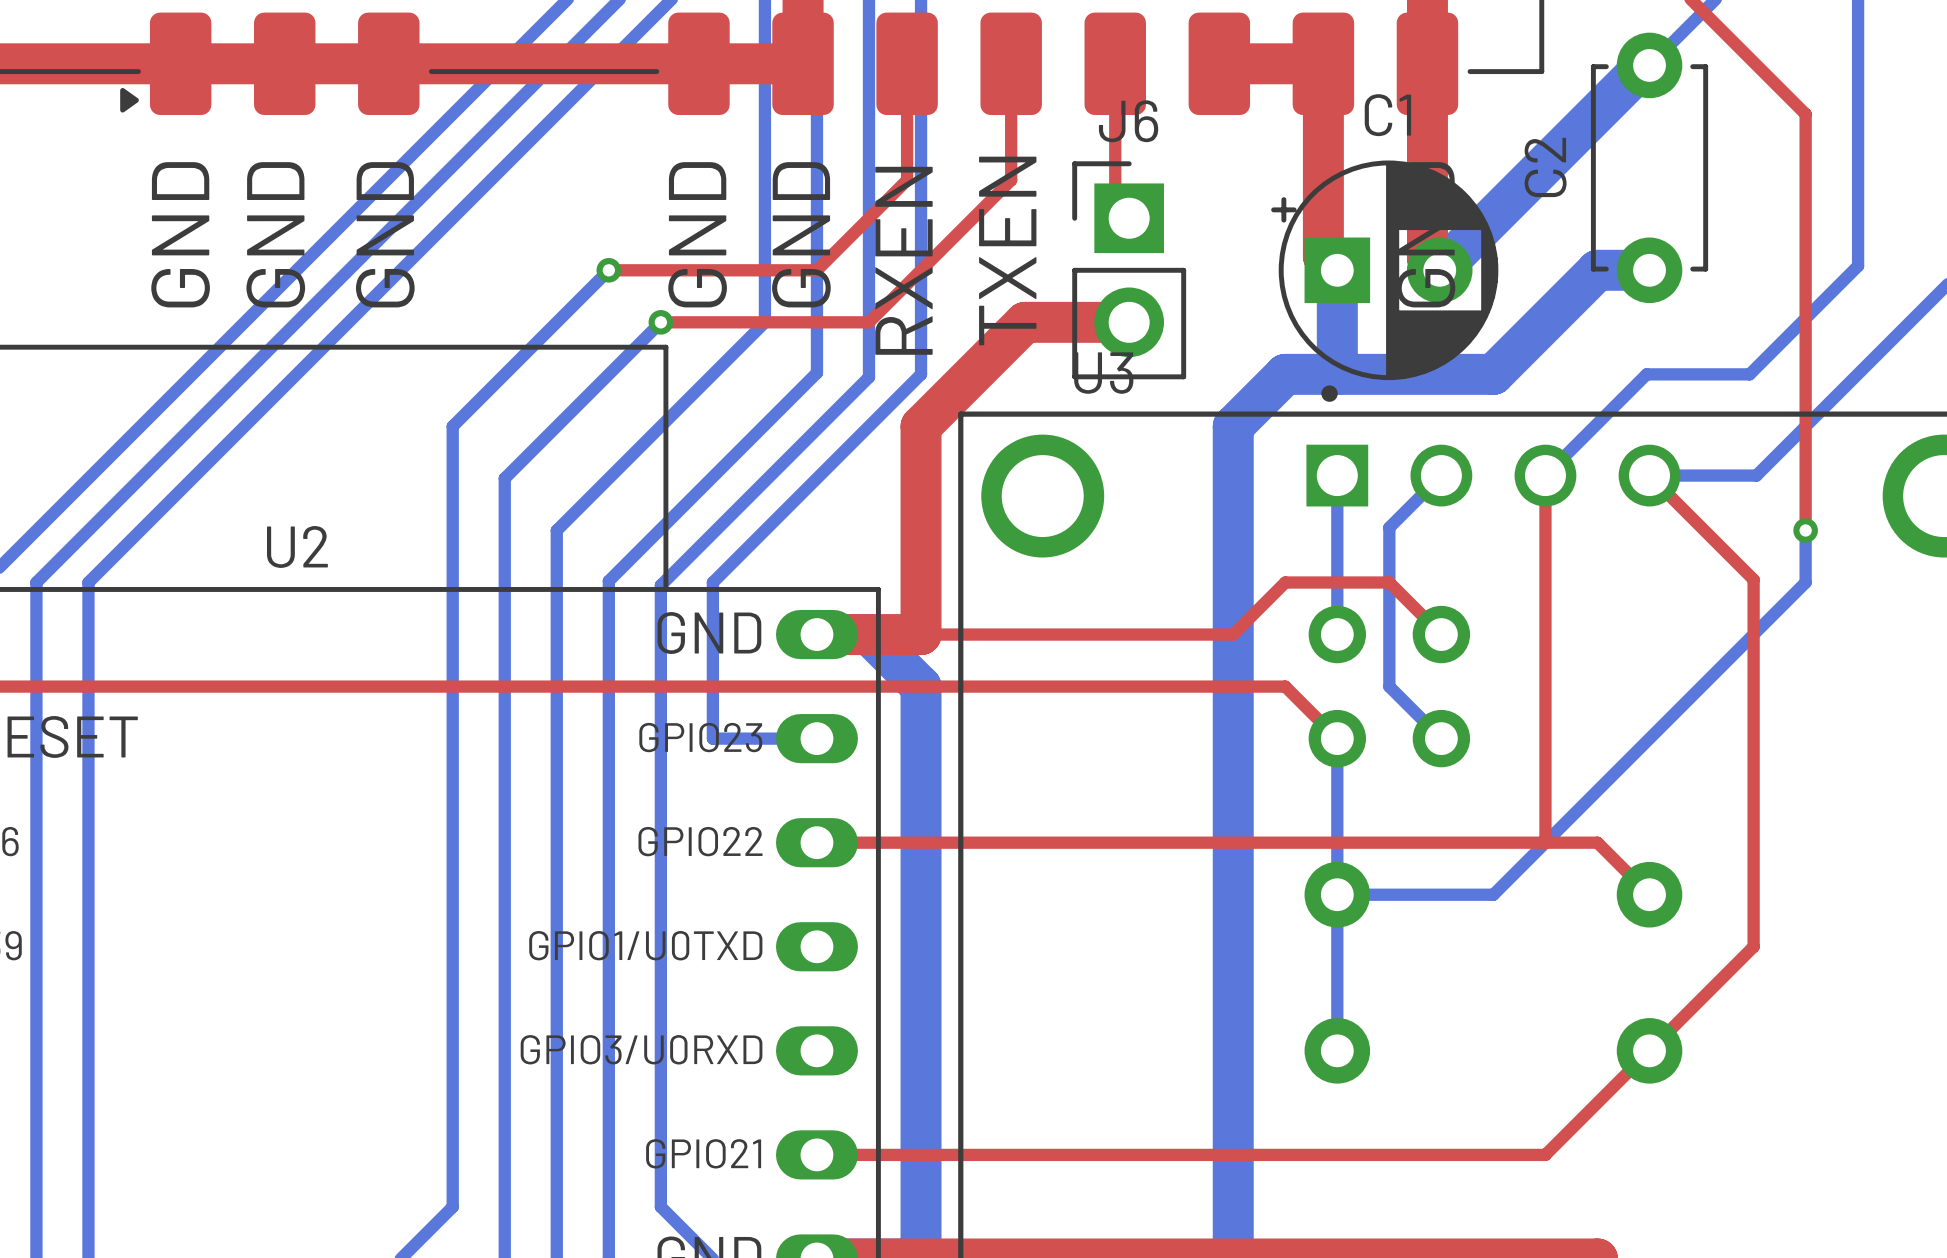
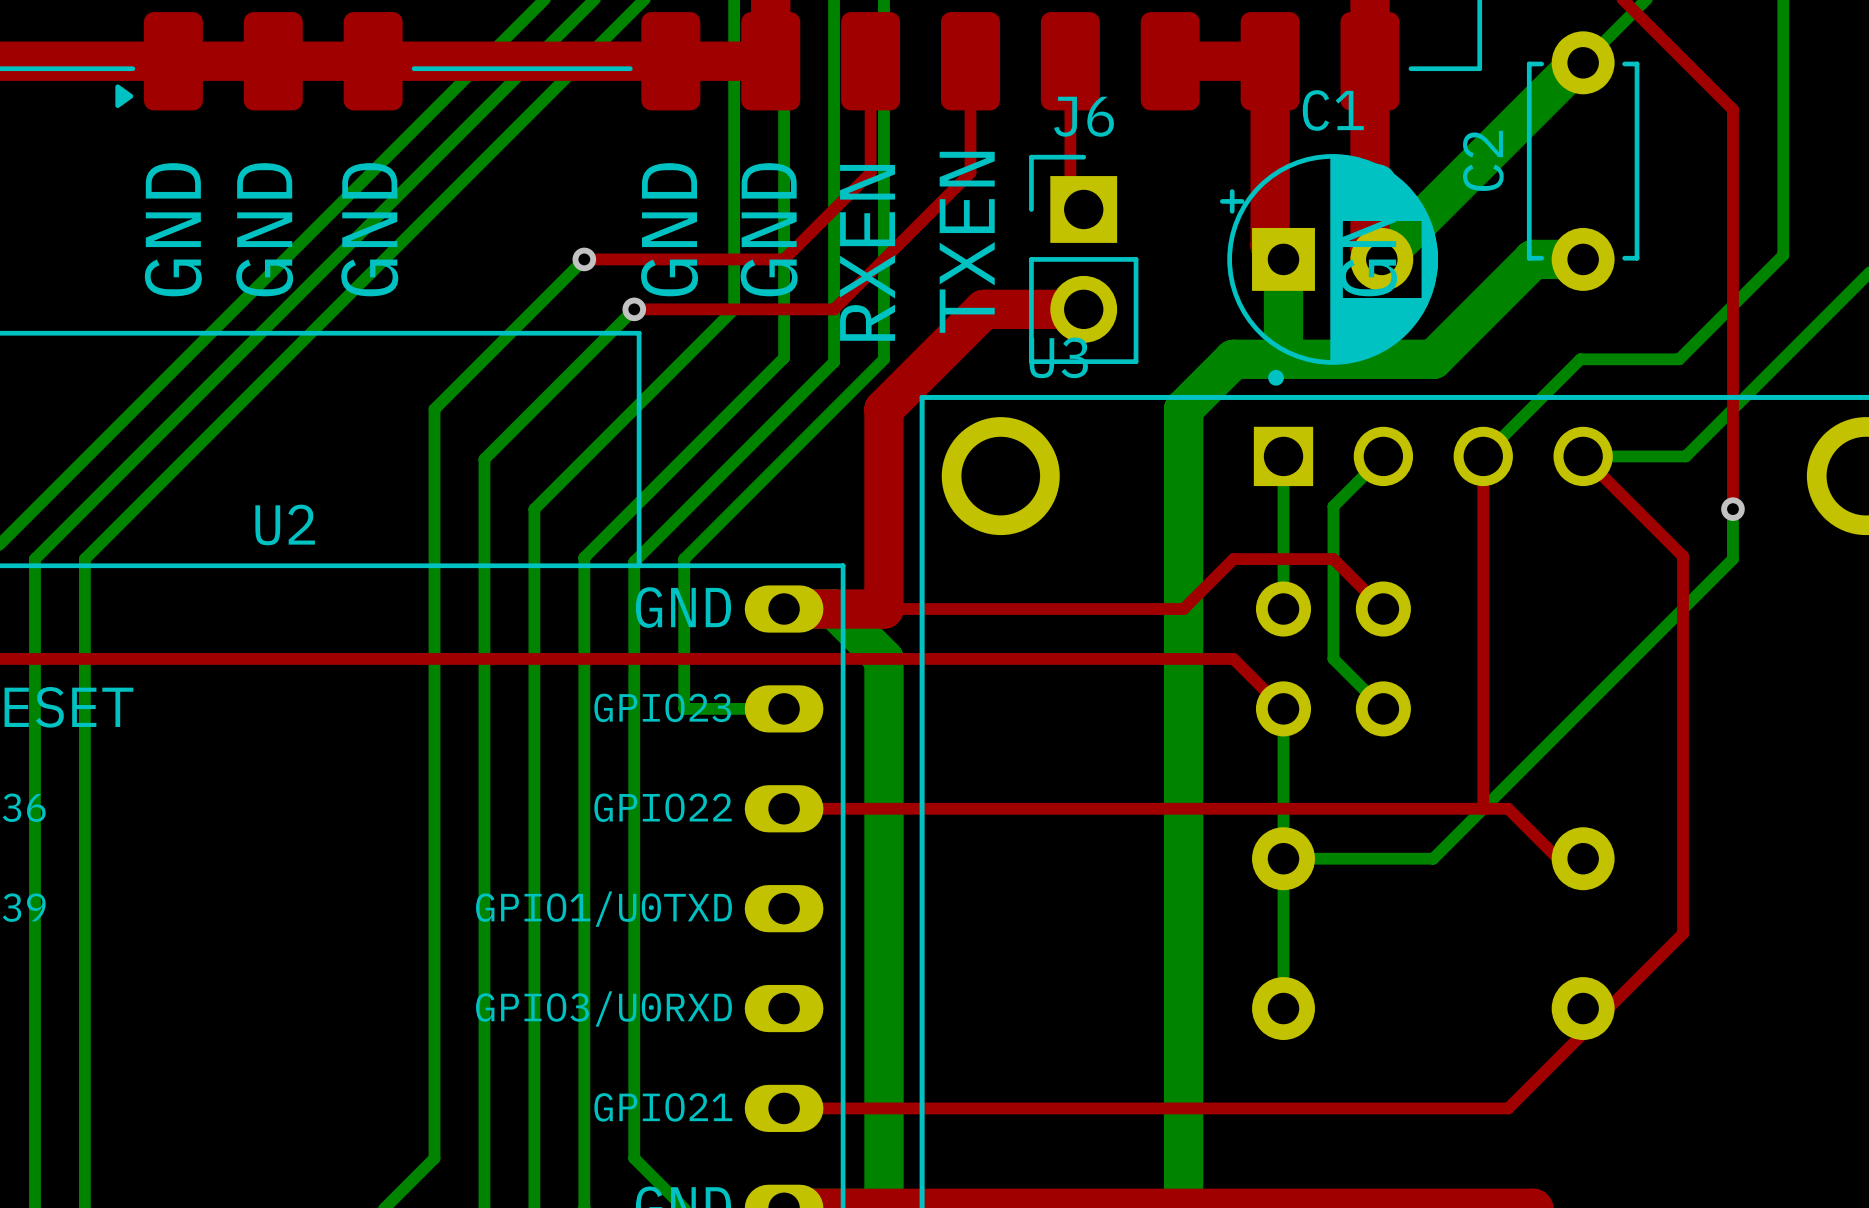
top track: (1571, 842) (1597, 842) (1649, 894) -> (1508, 808) (1583, 883)
top track: (1753, 946) (1545, 1154) -> (1683, 908) (1683, 933) (1508, 1108) (1483, 1108)

